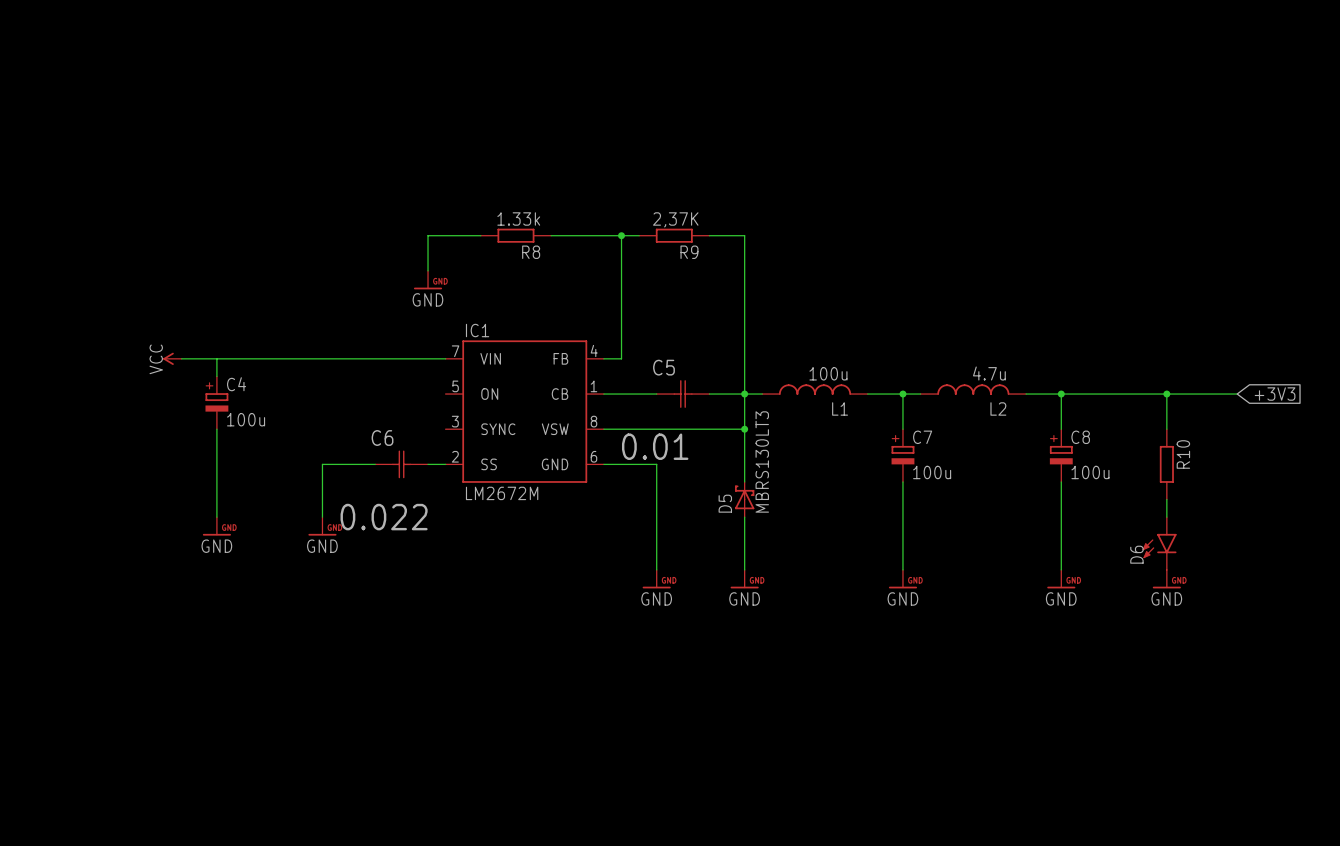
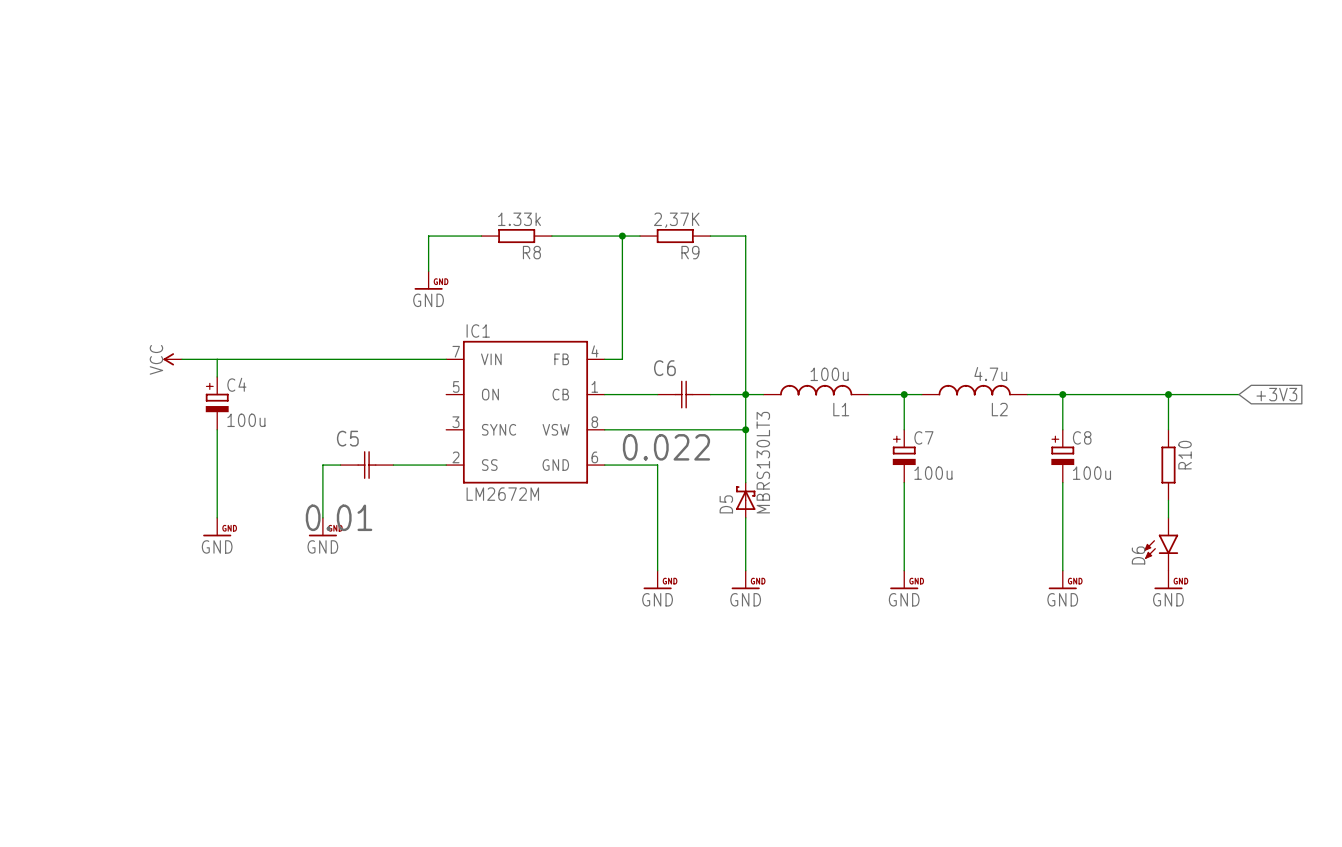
C5 name: C5 (663, 367) -> C6 (664, 368)
C5 value: 0.01 (655, 446) -> 0.022 (666, 447)
C5: none -> 0.01 (366, 465)
C6: 0.022 (401, 464) -> none

